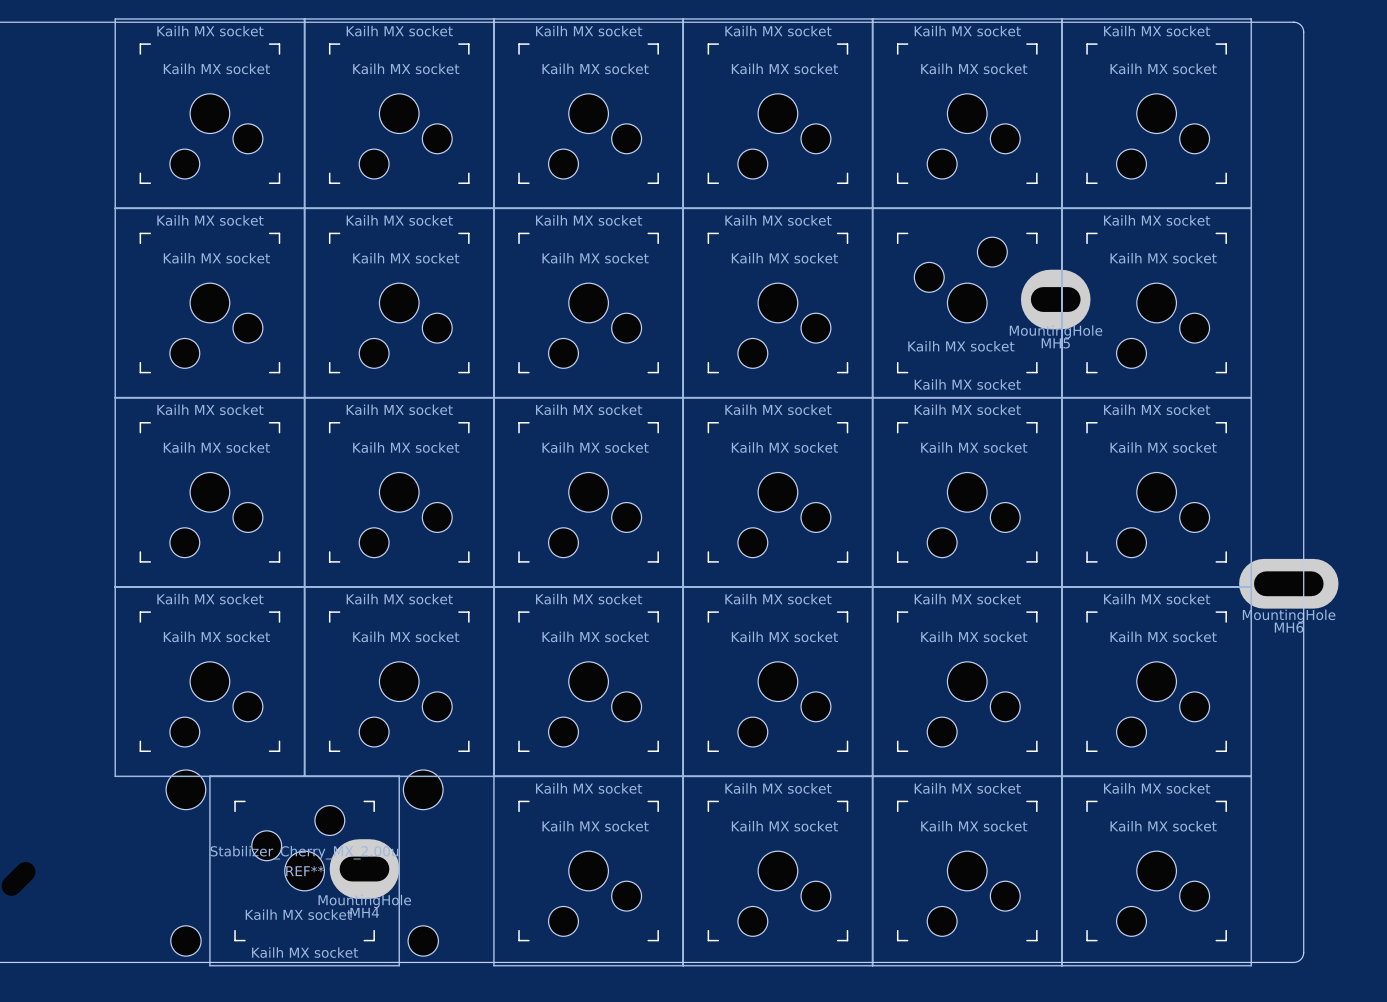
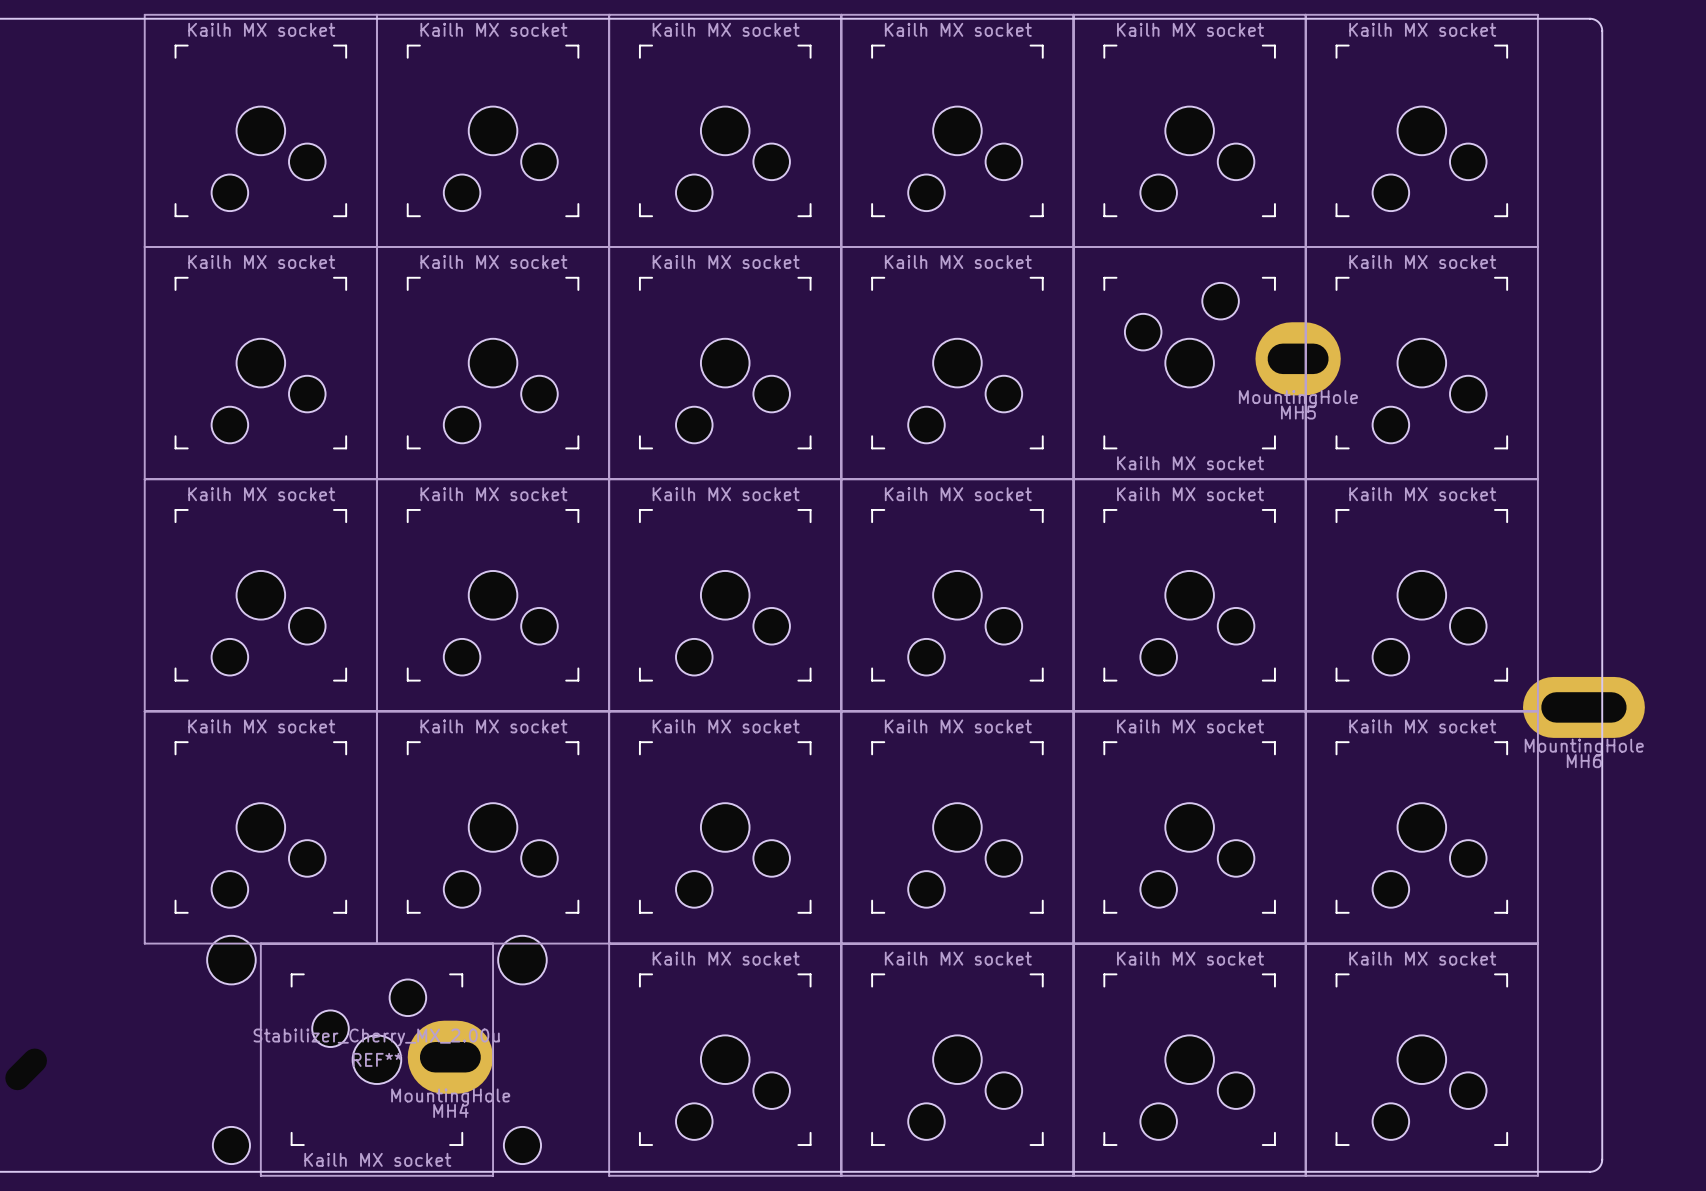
part footprint: [114, 18, 306, 210] -> [143, 13, 378, 248]
part footprint: [303, 18, 495, 210] -> [376, 13, 611, 248]
part footprint: [493, 18, 685, 210] -> [608, 13, 843, 248]
part footprint: [682, 18, 874, 210] -> [840, 13, 1075, 248]
part footprint: [871, 18, 1063, 210] -> [1072, 13, 1307, 248]
part footprint: [1061, 18, 1253, 210] -> [1304, 13, 1539, 248]
part: Kailh MX socket (216, 151) -> none
part: Kailh MX socket (405, 151) -> none
part: Kailh MX socket (595, 151) -> none
part: Kailh MX socket (784, 151) -> none
part: Kailh MX socket (973, 151) -> none
part: Kailh MX socket (1163, 151) -> none
part footprint: [114, 207, 306, 399] -> [143, 246, 378, 481]
part footprint: [303, 207, 495, 399] -> [376, 246, 611, 481]
part footprint: [493, 207, 685, 399] -> [608, 246, 843, 481]
part footprint: [682, 207, 874, 399] -> [840, 246, 1075, 481]
part footprint: [871, 207, 1063, 399] -> [1072, 246, 1307, 481]
part footprint: [1061, 207, 1253, 399] -> [1304, 246, 1539, 481]
part: Kailh MX socket (960, 264) -> none
part: Kailh MX socket (216, 340) -> none
part: Kailh MX socket (405, 340) -> none
part: Kailh MX socket (595, 340) -> none
part: Kailh MX socket (784, 340) -> none
part: Kailh MX socket (1163, 340) -> none
part footprint: [114, 396, 306, 588] -> [143, 478, 378, 713]
part footprint: [303, 396, 495, 588] -> [376, 478, 611, 713]
part footprint: [493, 396, 685, 588] -> [608, 478, 843, 713]
part footprint: [682, 396, 874, 588] -> [840, 478, 1075, 713]
part footprint: [871, 396, 1063, 588] -> [1072, 478, 1307, 713]
part footprint: [1061, 396, 1253, 588] -> [1304, 478, 1539, 713]
part: Kailh MX socket (216, 530) -> none
part: Kailh MX socket (405, 530) -> none
part: Kailh MX socket (595, 530) -> none
part: Kailh MX socket (784, 530) -> none
part: Kailh MX socket (973, 530) -> none
part: Kailh MX socket (1163, 530) -> none
part footprint: [114, 586, 306, 778] -> [143, 710, 378, 945]
part footprint: [303, 586, 495, 778] -> [376, 710, 611, 945]
part footprint: [493, 586, 685, 778] -> [608, 710, 843, 945]
part footprint: [682, 586, 874, 778] -> [840, 710, 1075, 945]
part footprint: [871, 586, 1063, 778] -> [1072, 710, 1307, 945]
part footprint: [1061, 586, 1253, 778] -> [1304, 710, 1539, 945]
part: Kailh MX socket (216, 719) -> none
part: Kailh MX socket (405, 719) -> none
part: Kailh MX socket (595, 719) -> none
part: Kailh MX socket (784, 719) -> none
part: Kailh MX socket (973, 719) -> none
part: Kailh MX socket (1163, 719) -> none
part footprint: [493, 775, 685, 967] -> [608, 942, 843, 1177]
part footprint: [682, 775, 874, 967] -> [840, 942, 1075, 1177]
part footprint: [871, 775, 1063, 967] -> [1072, 942, 1307, 1177]
part footprint: [1061, 775, 1253, 967] -> [1304, 942, 1539, 1177]
part: Kailh MX socket (298, 833) -> none
part: Kailh MX socket (595, 908) -> none
part: Kailh MX socket (784, 908) -> none
part: Kailh MX socket (973, 908) -> none
part: Kailh MX socket (1163, 908) -> none

